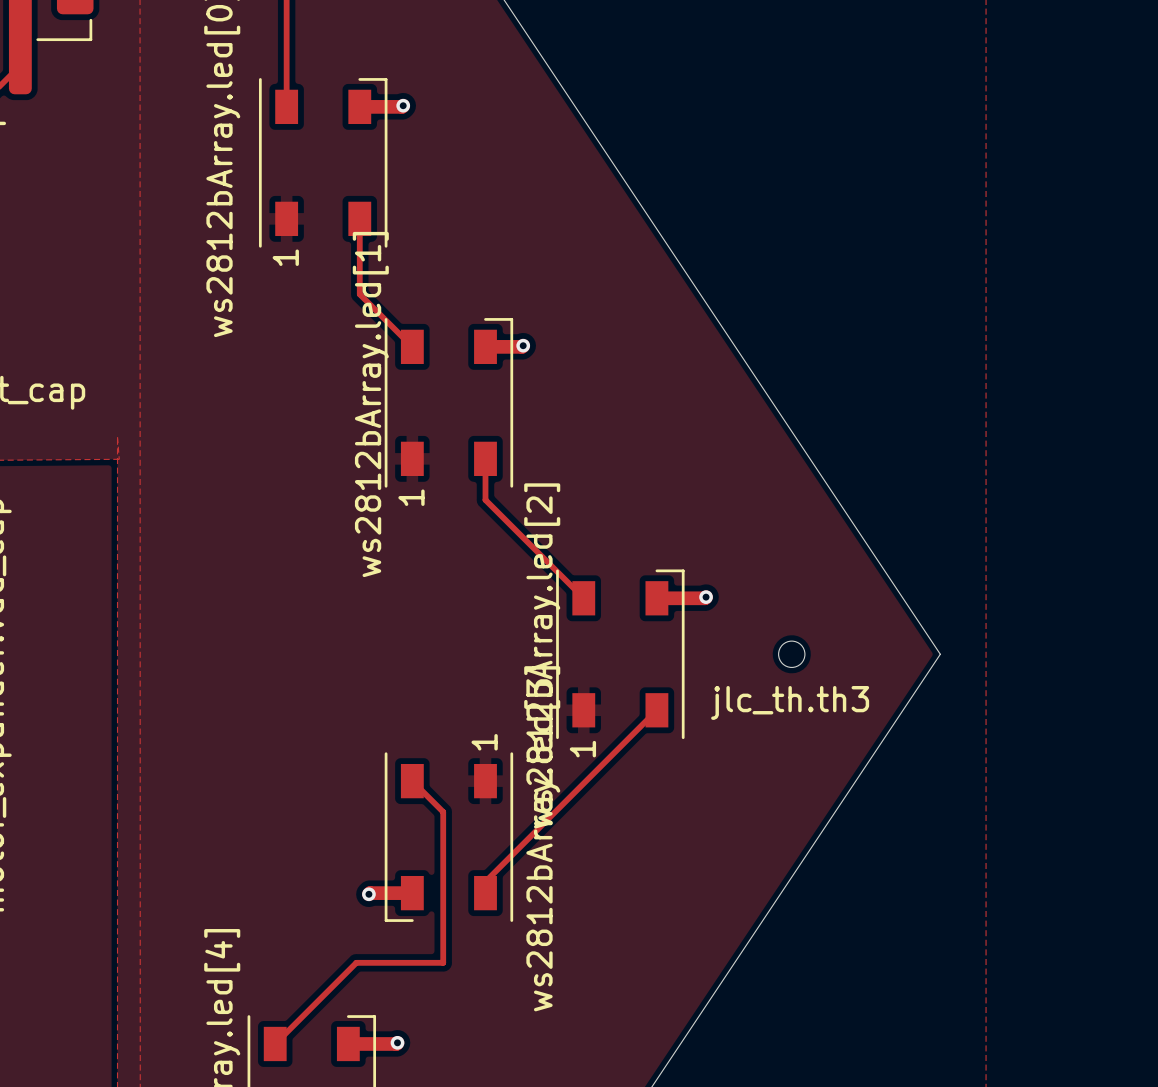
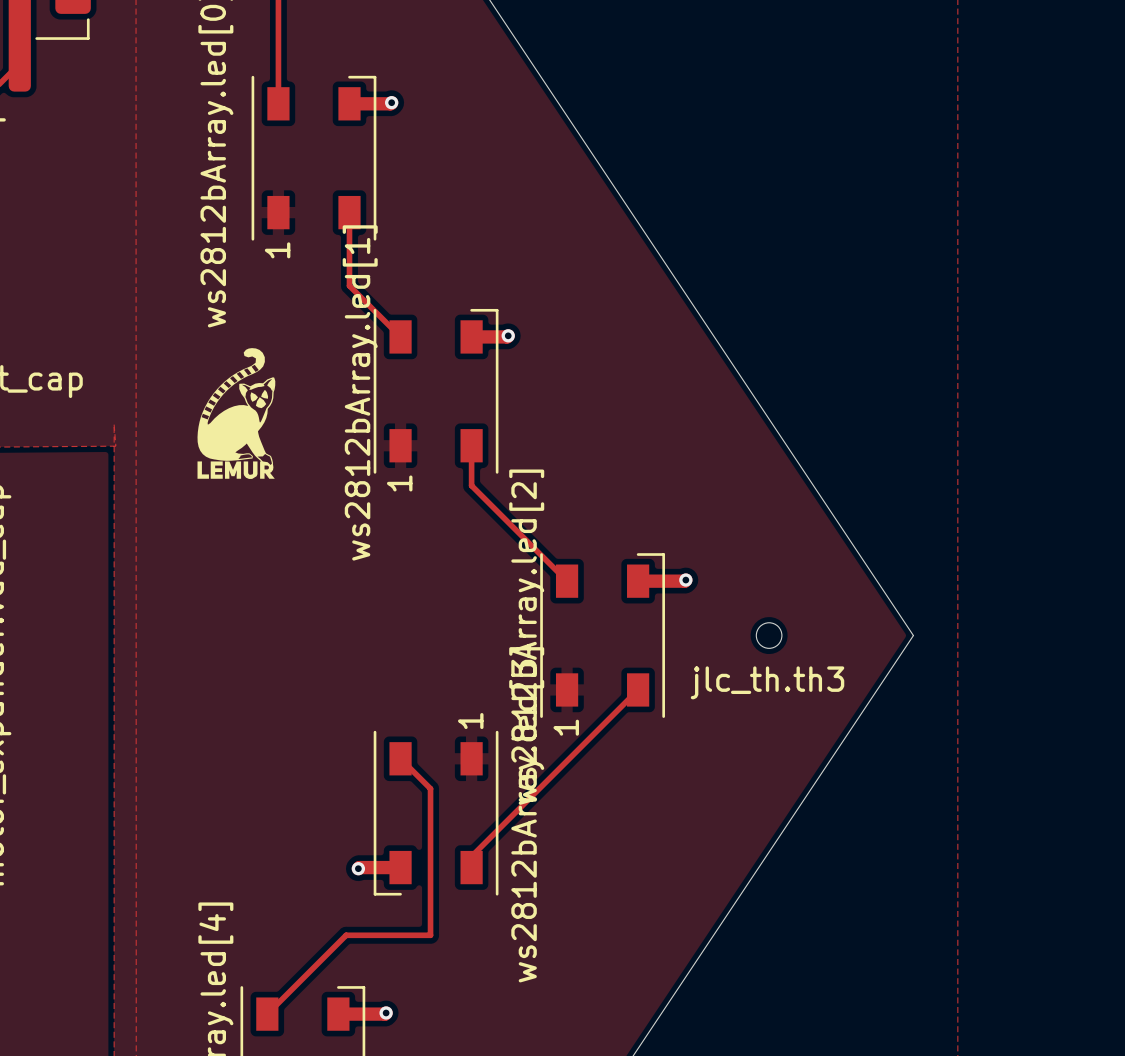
drawing: none -> [197, 348, 276, 479]

